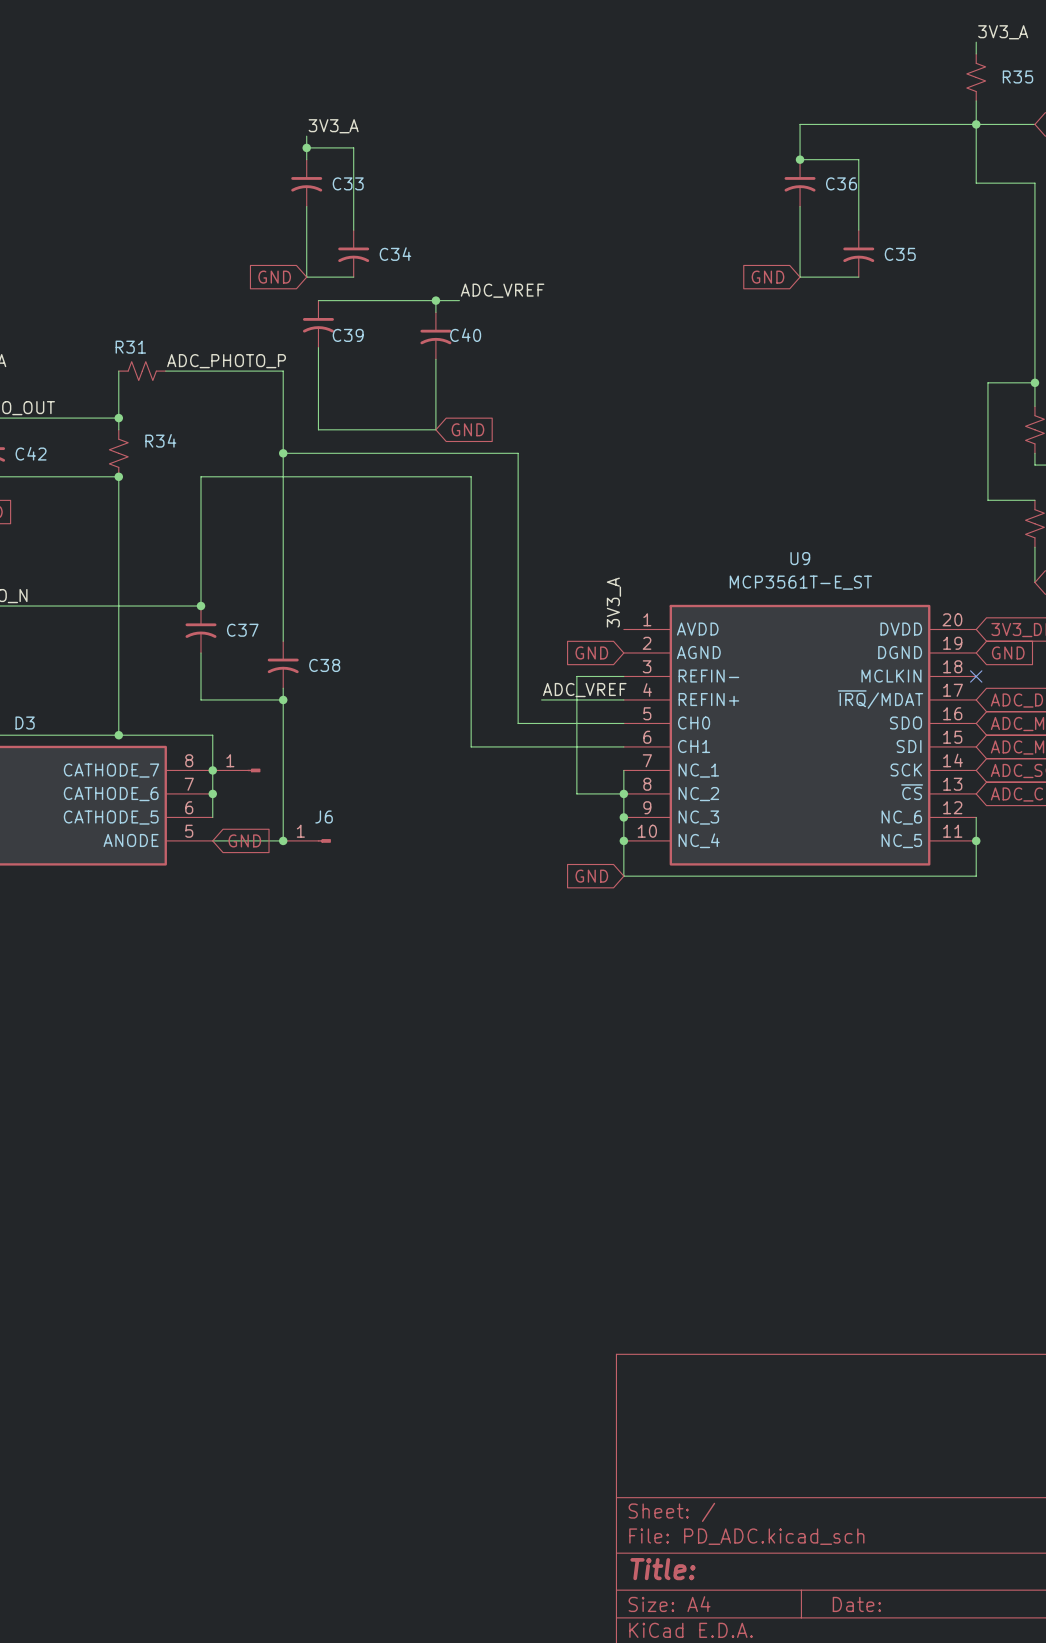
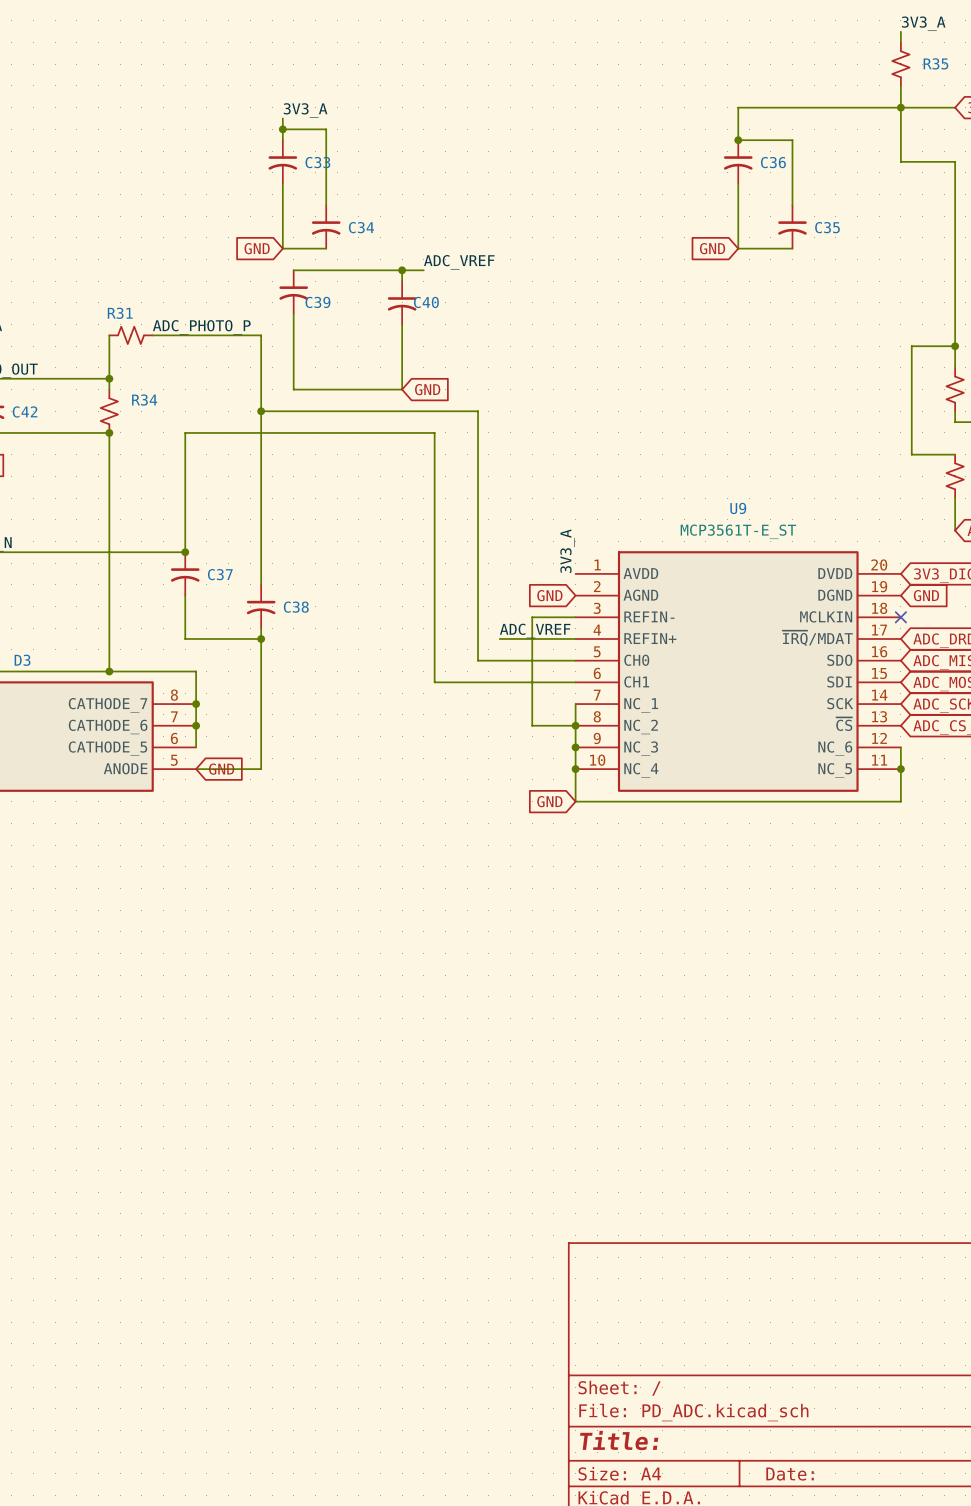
part: (236, 770) -> none
junction: (283, 840) -> none
J6: (307, 840) -> none

